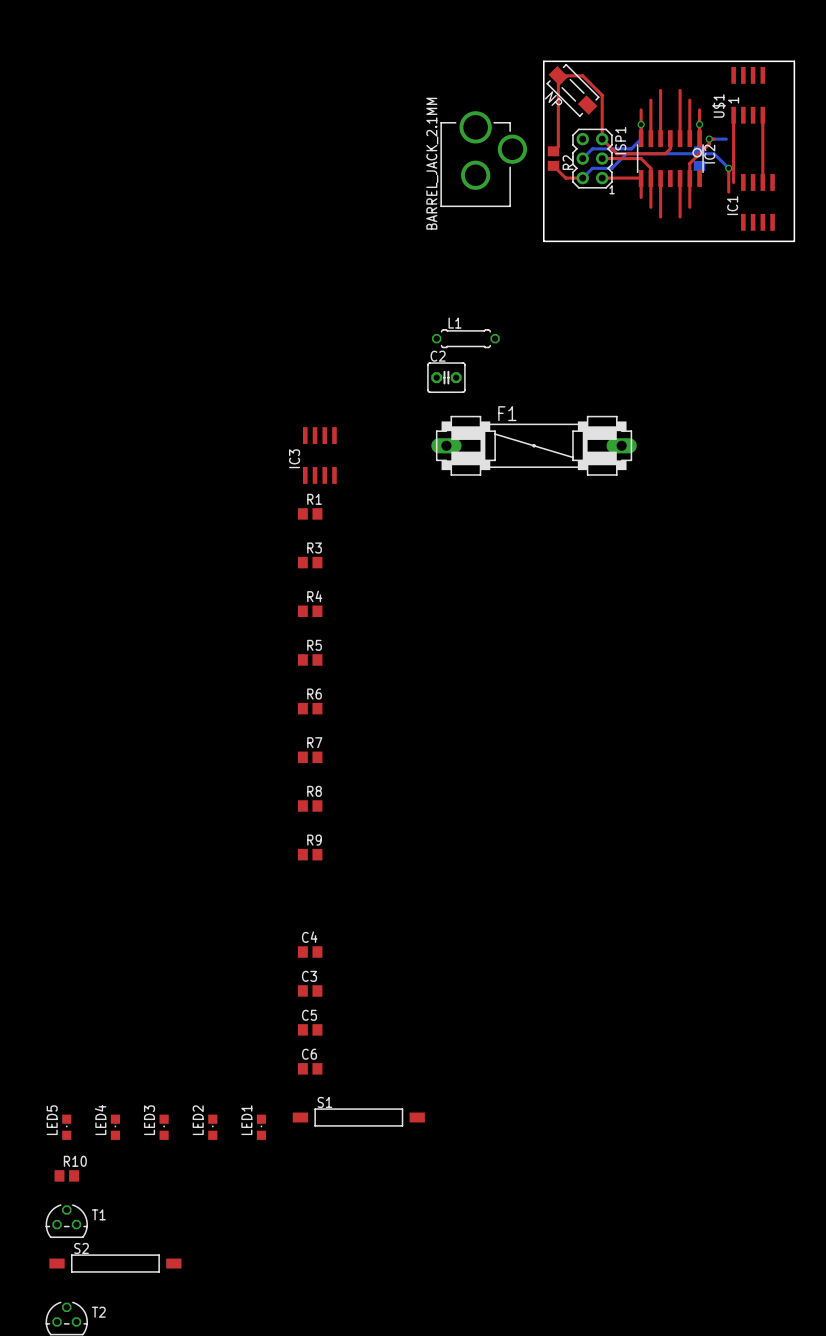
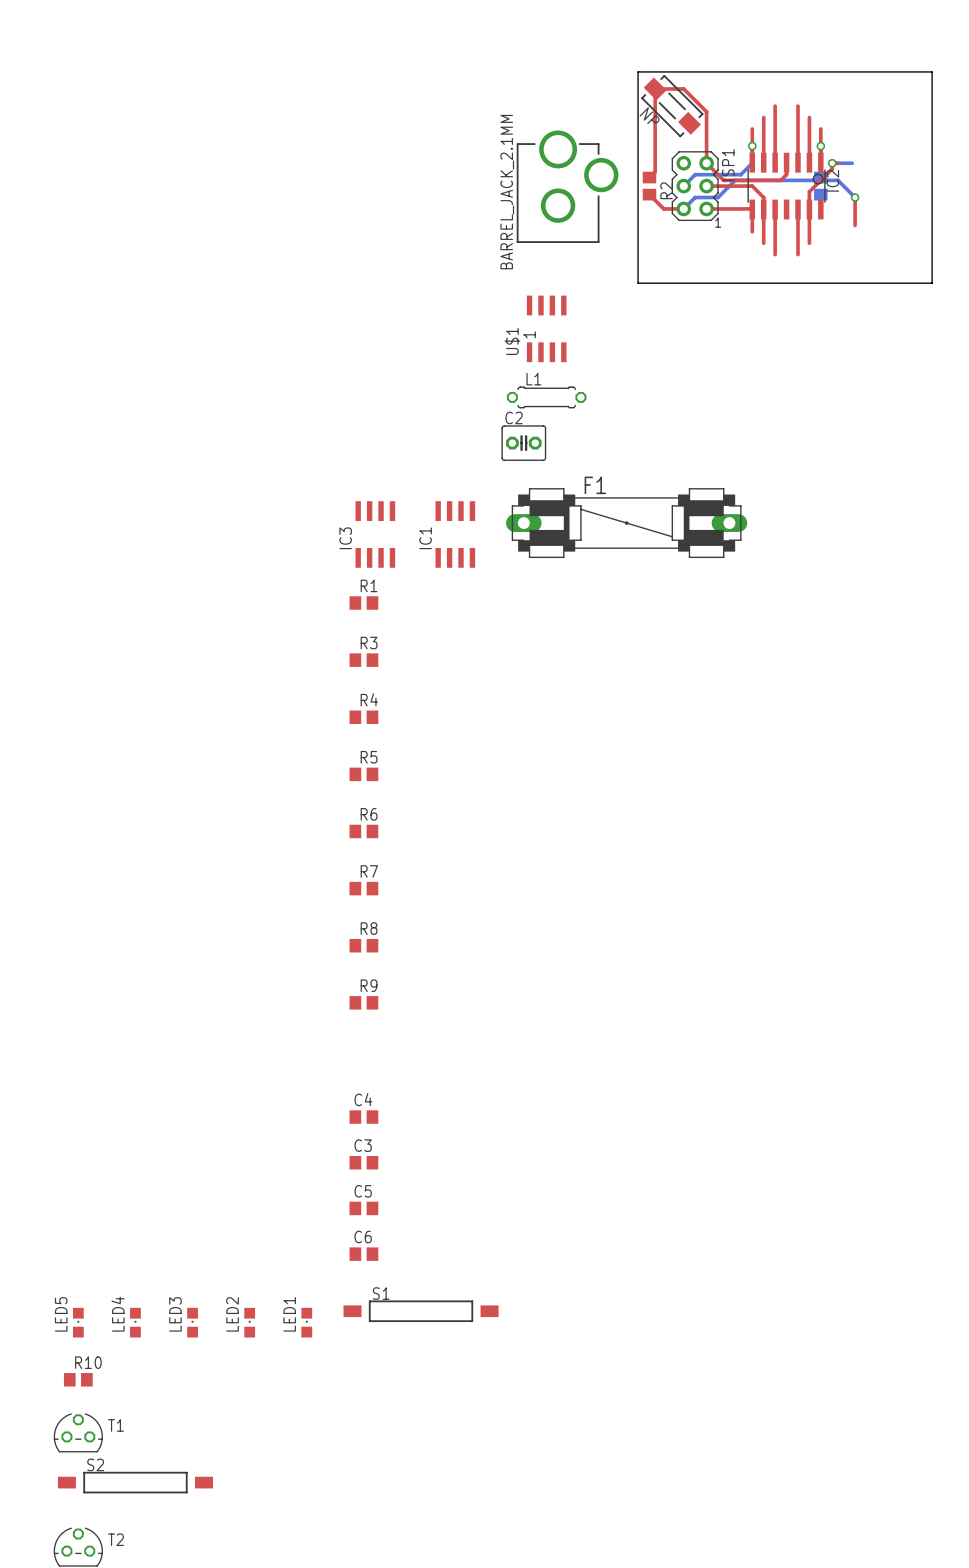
U$1 position: (748, 95) -> (546, 328)
top track: (733, 115) (733, 182) -> none
top track: (762, 115) (762, 182) -> none
IC1 position: (757, 202) -> (455, 534)

